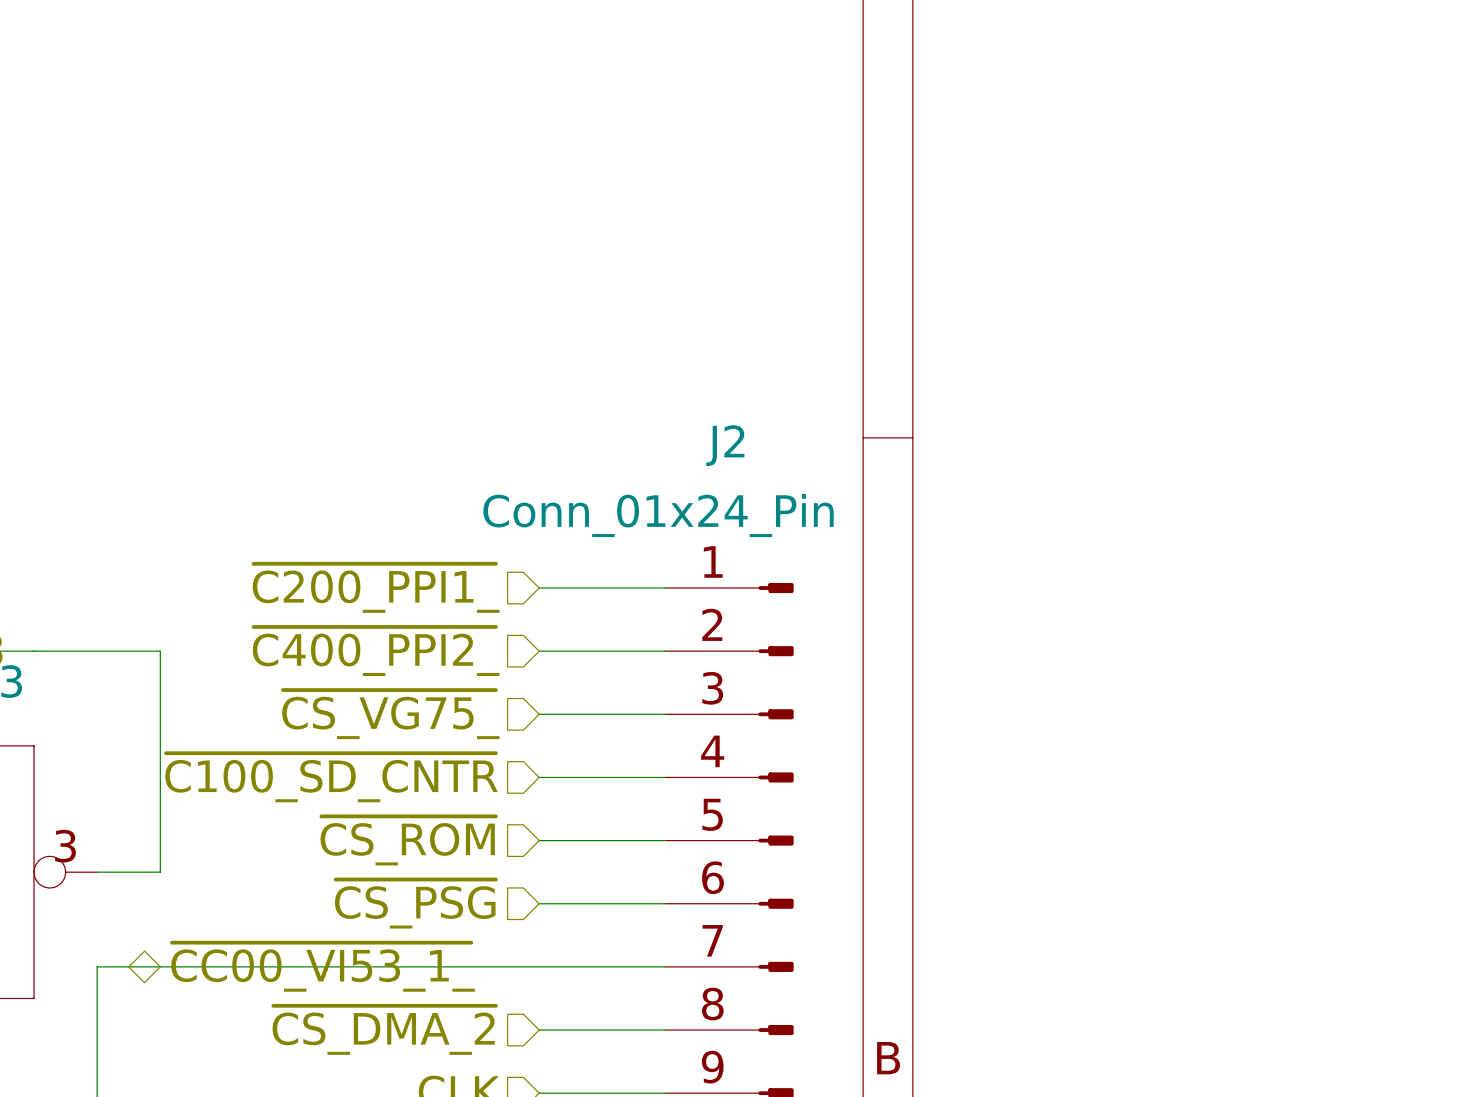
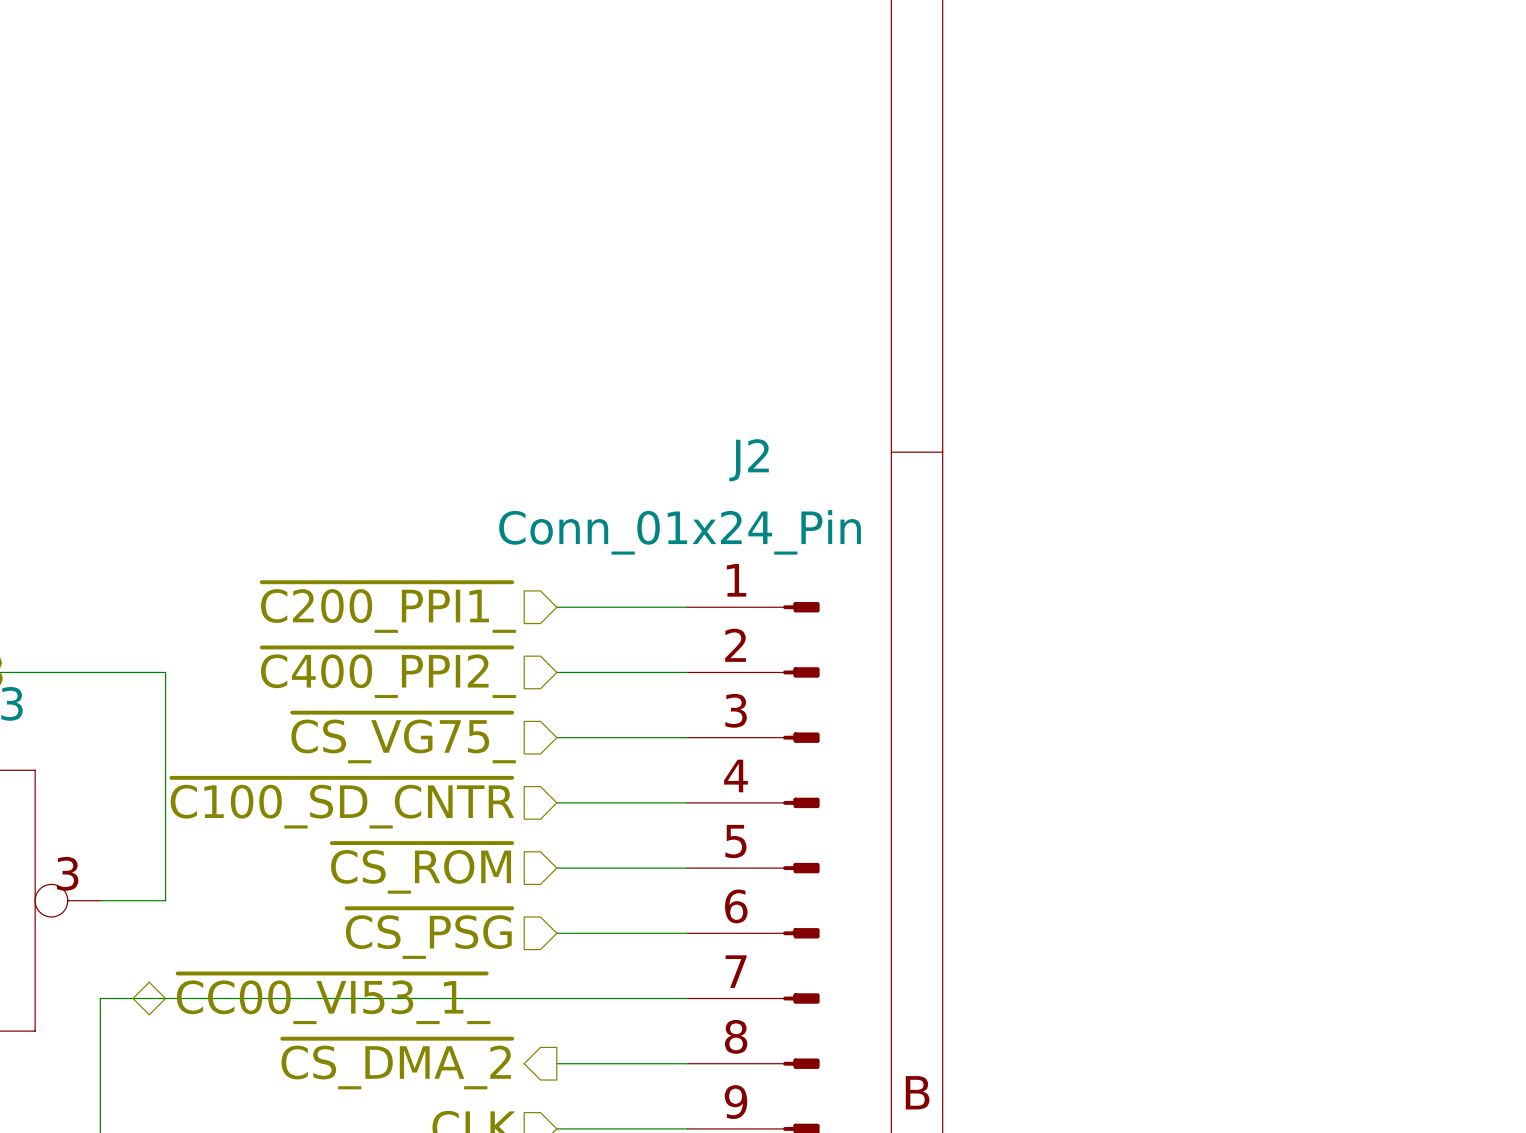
hierarchical label shape: input (384, 1030) -> output (396, 1064)

